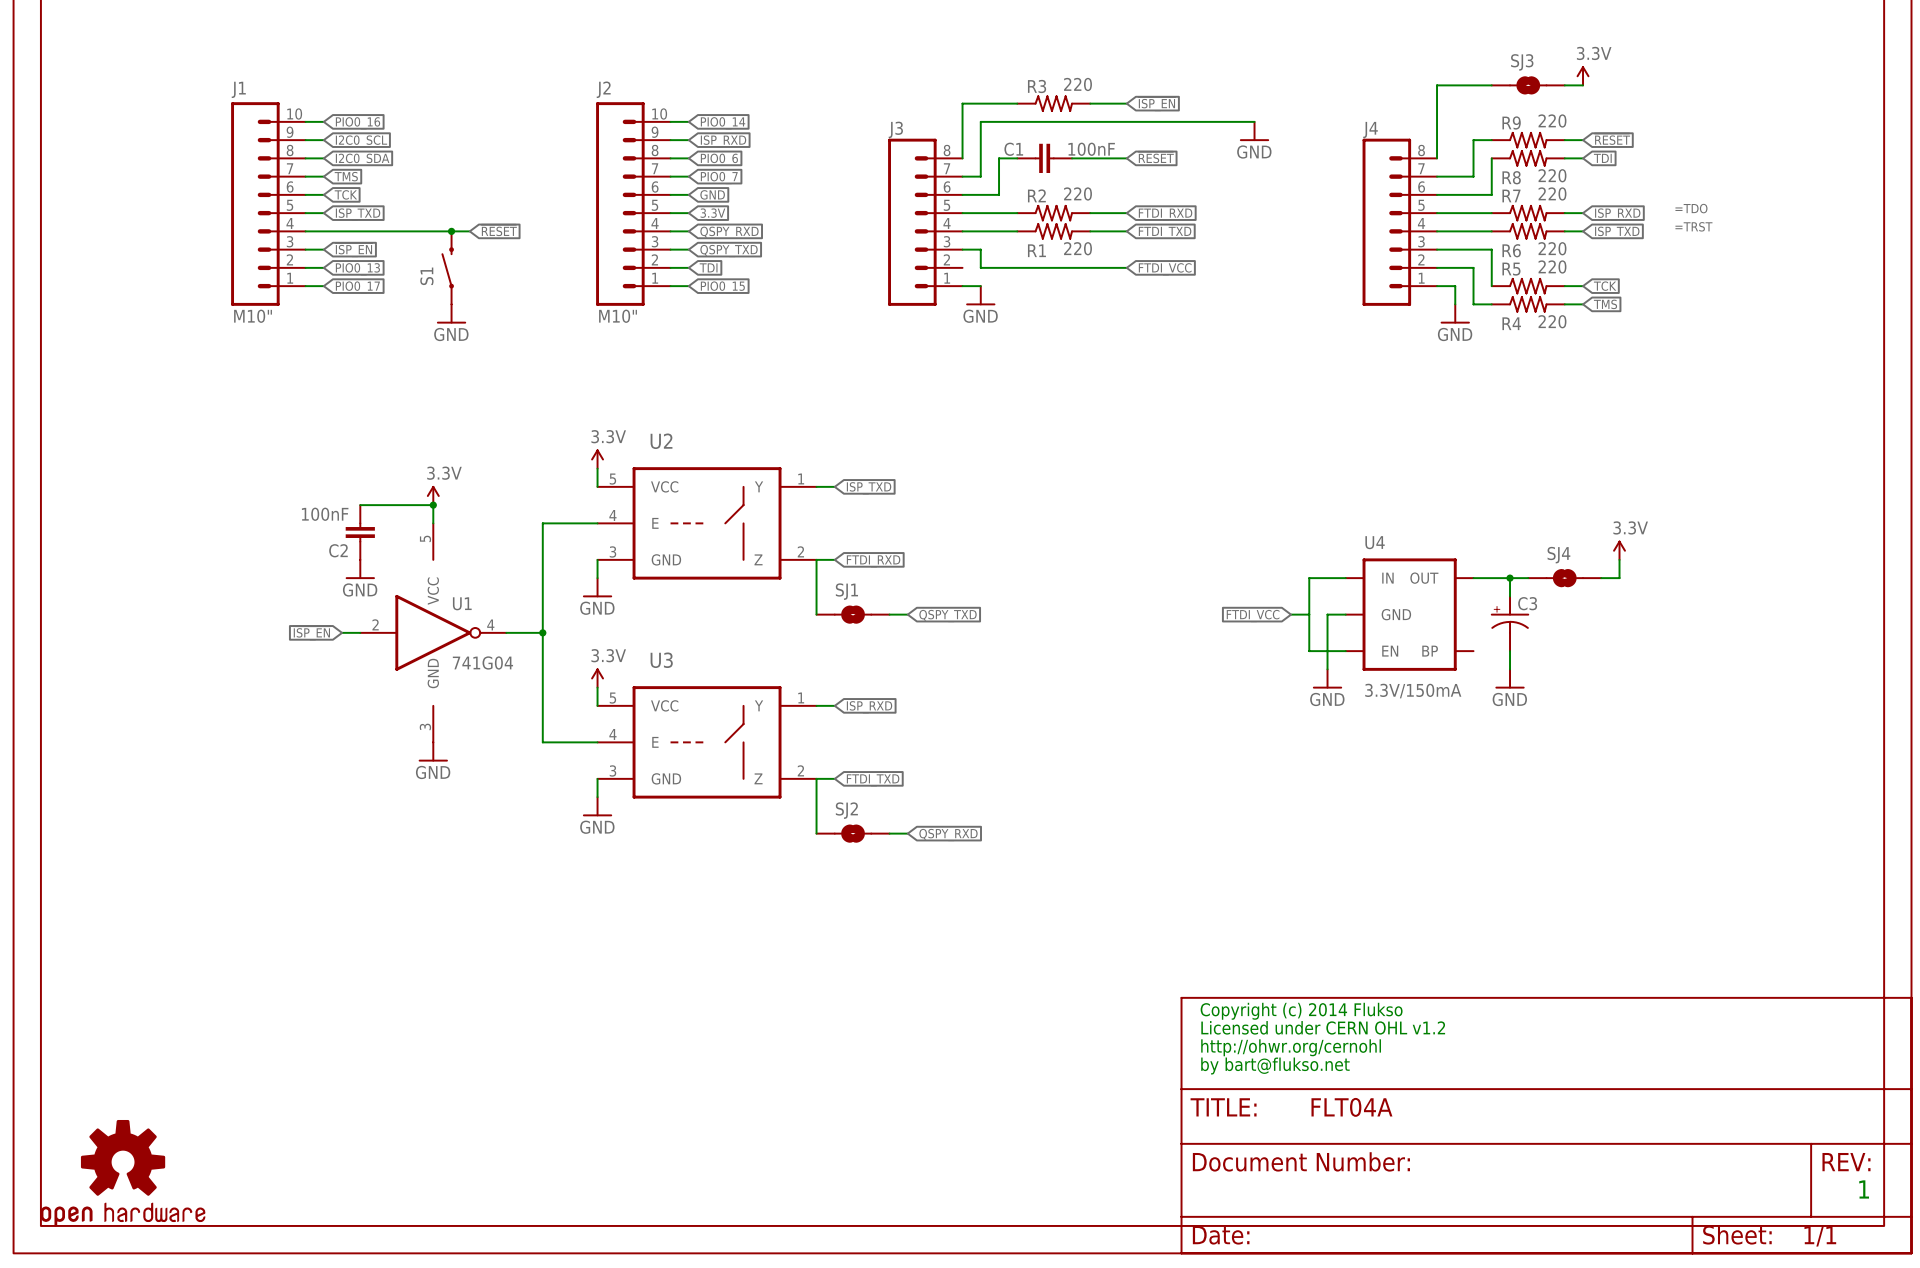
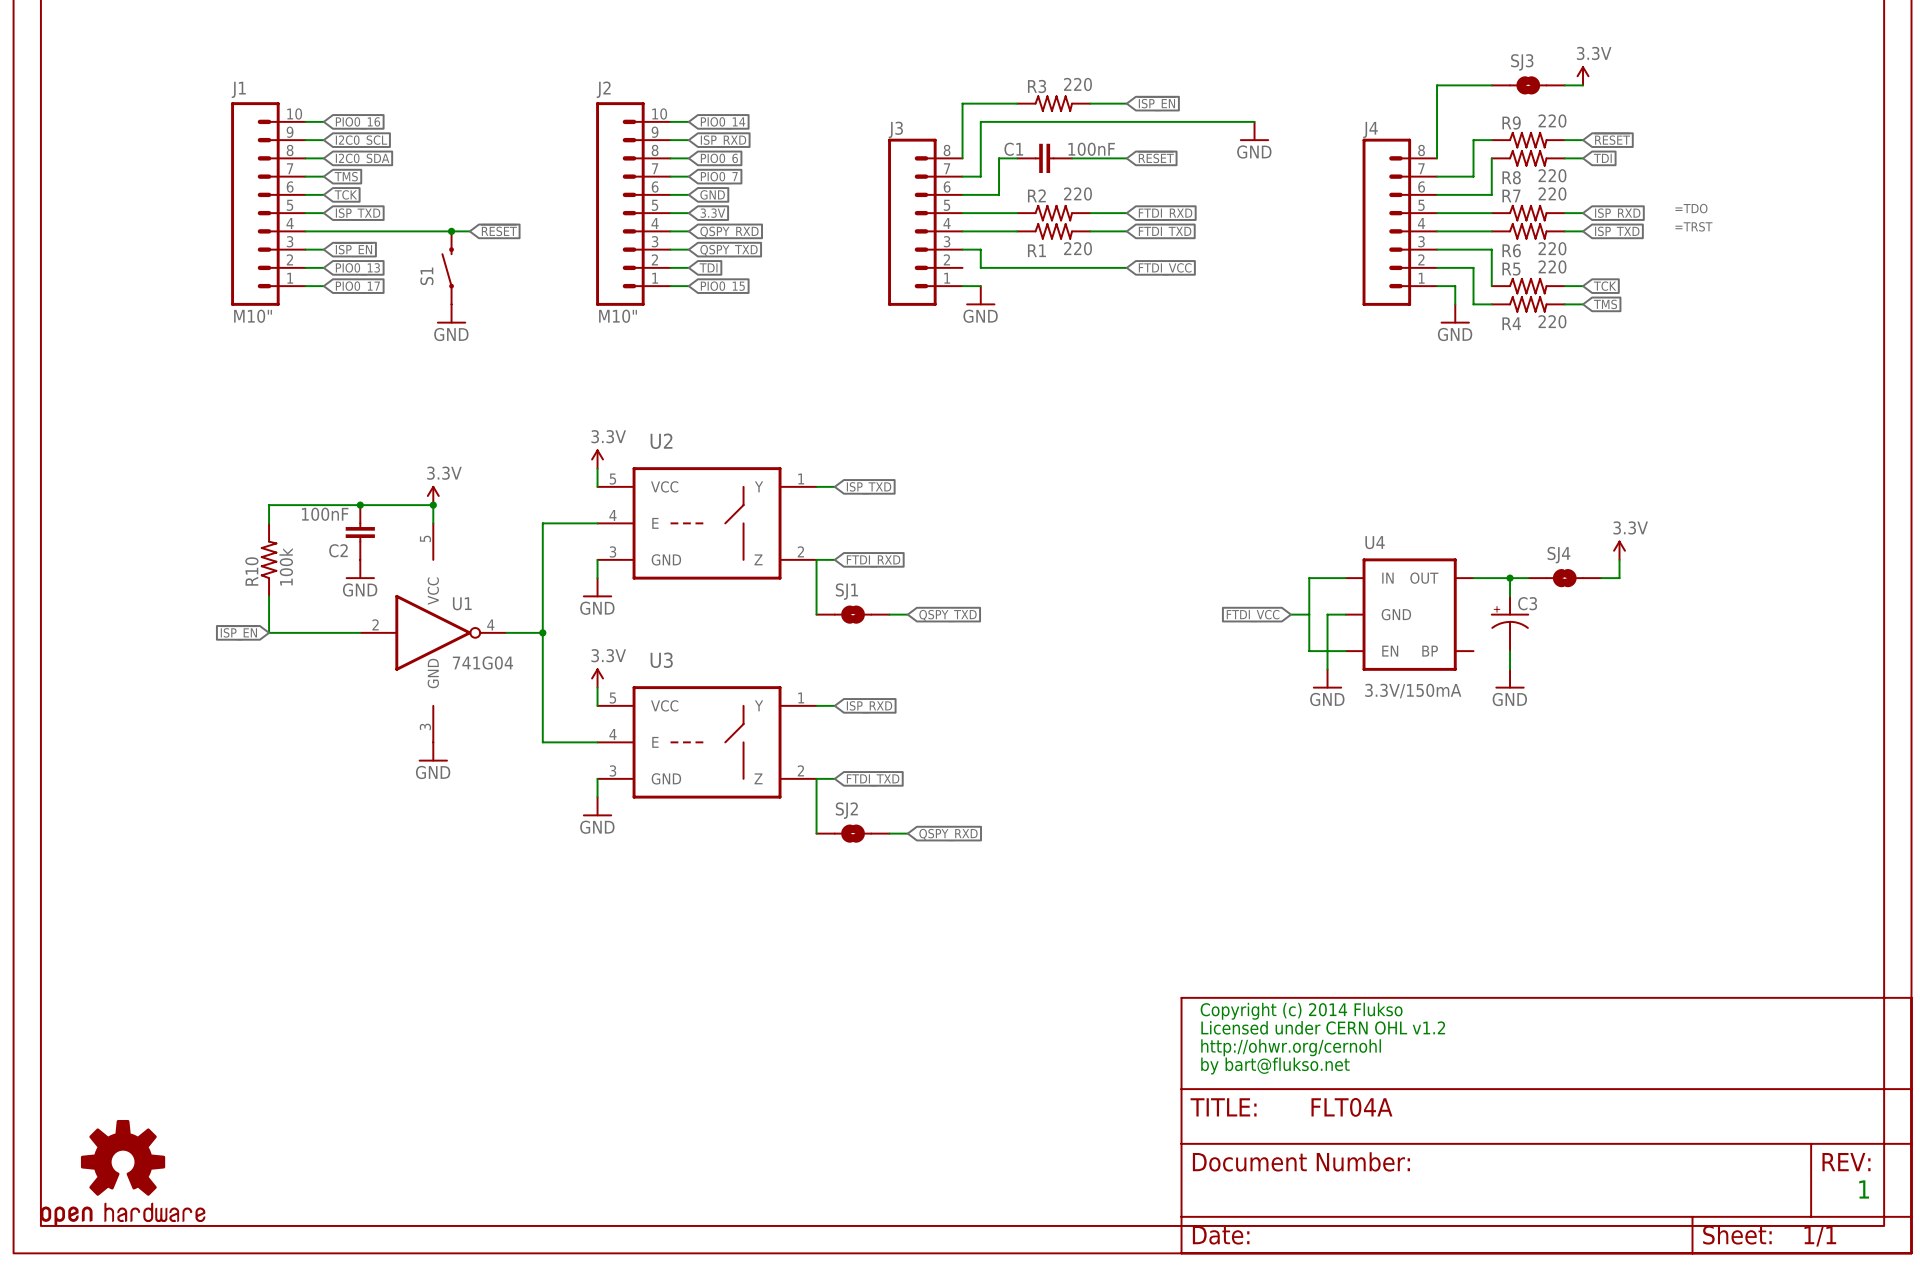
wire: none -> (360, 505) (269, 505) (269, 523)
junction: none -> (360, 505)
R10: none -> 100k (269, 559)
wire: none -> (269, 596) (269, 632) (342, 632)
global label position: ~{ISP_EN} (311, 633) -> ~{ISP_EN} (238, 633)

